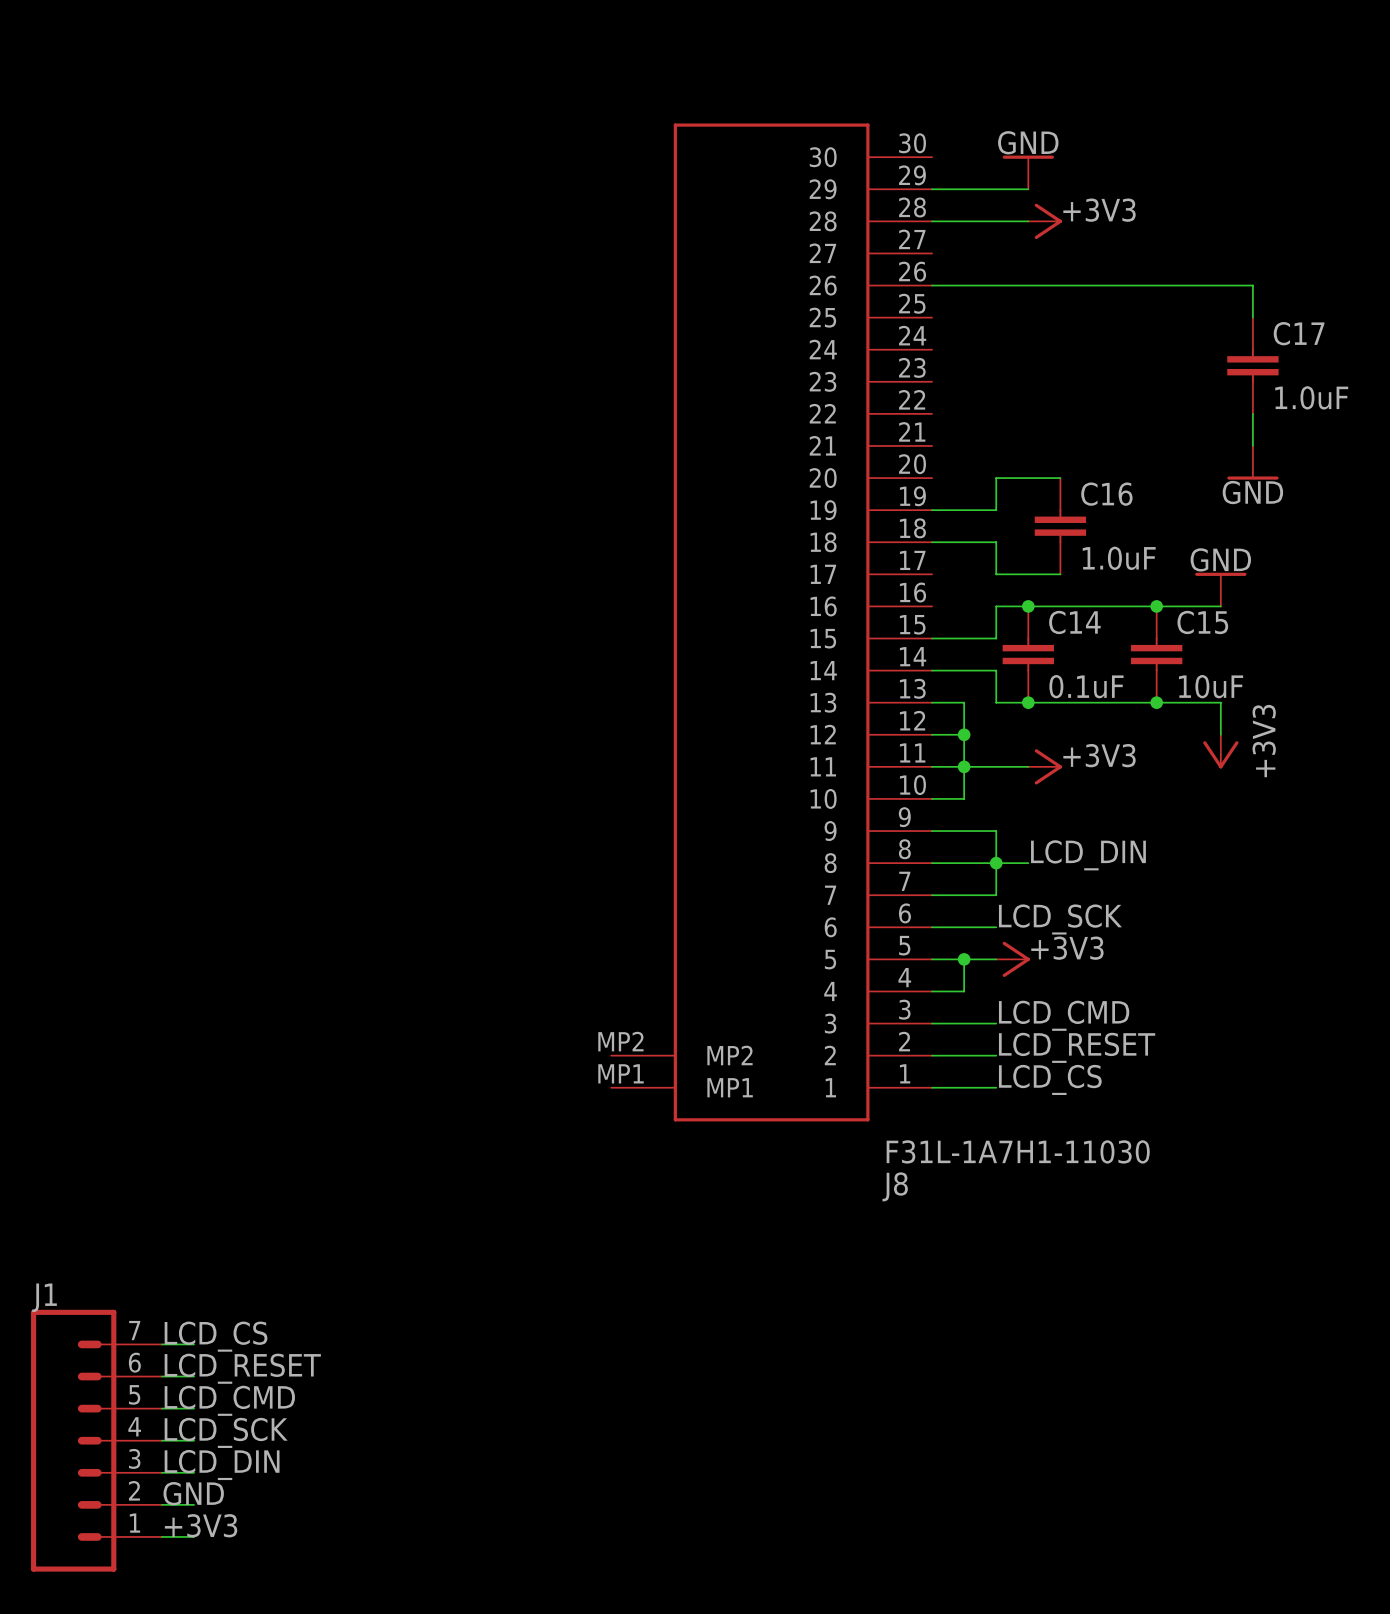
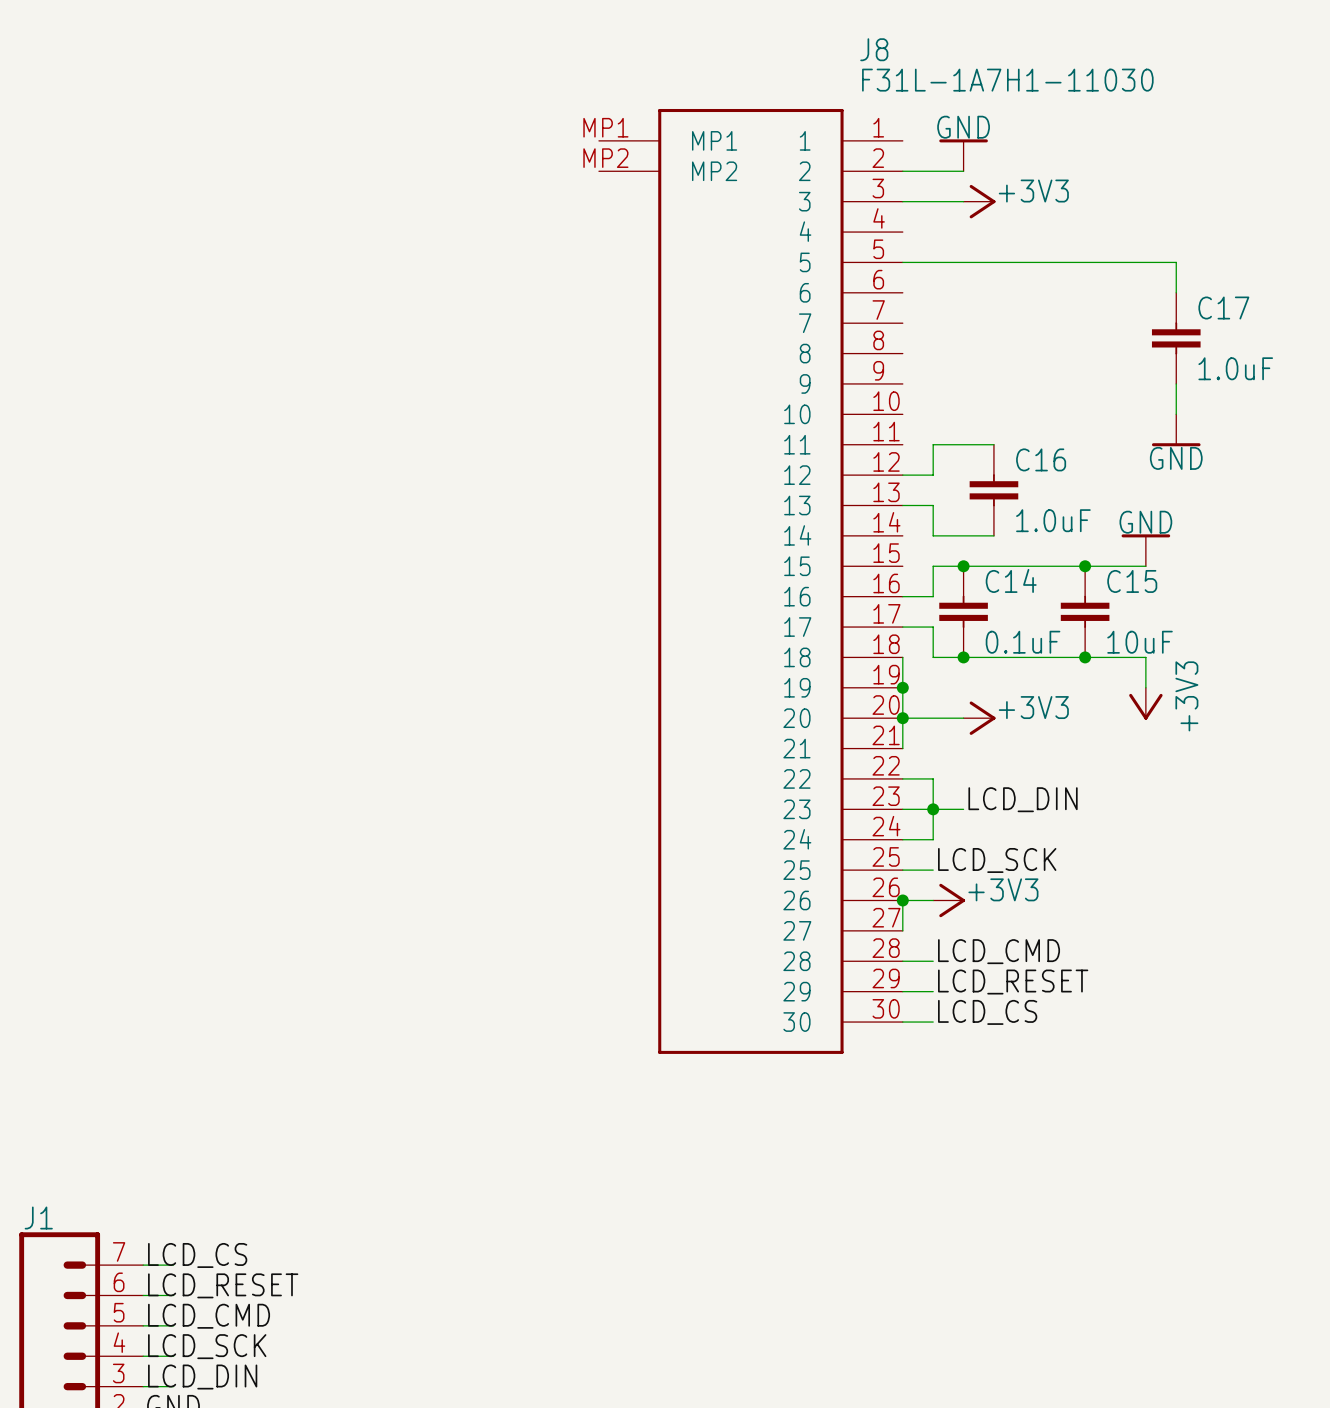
J8 flip: as is (771, 622) -> up-down (750, 581)

